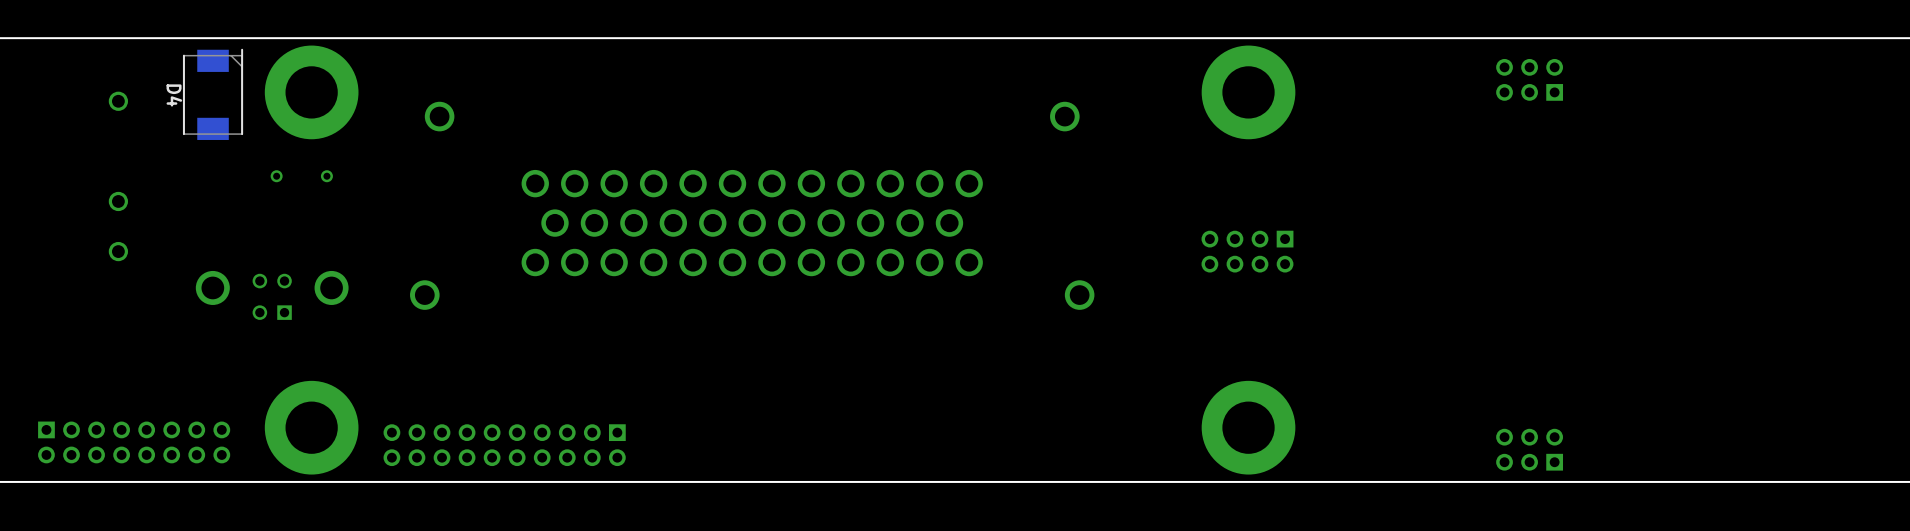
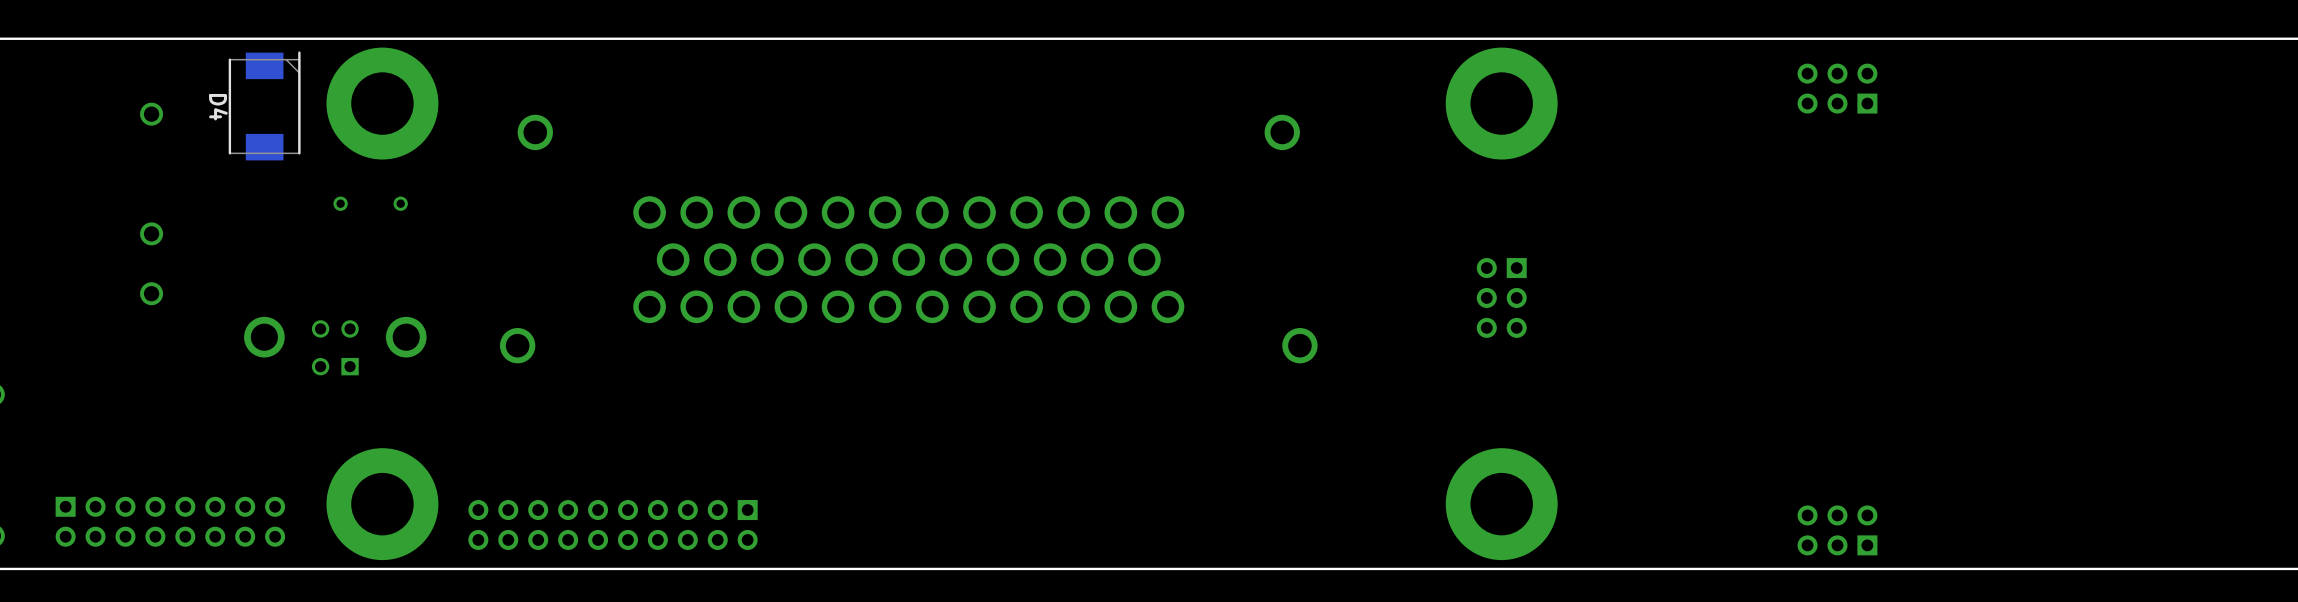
part footprint: [1201, 230, 1294, 273] -> [1476, 258, 1527, 338]

